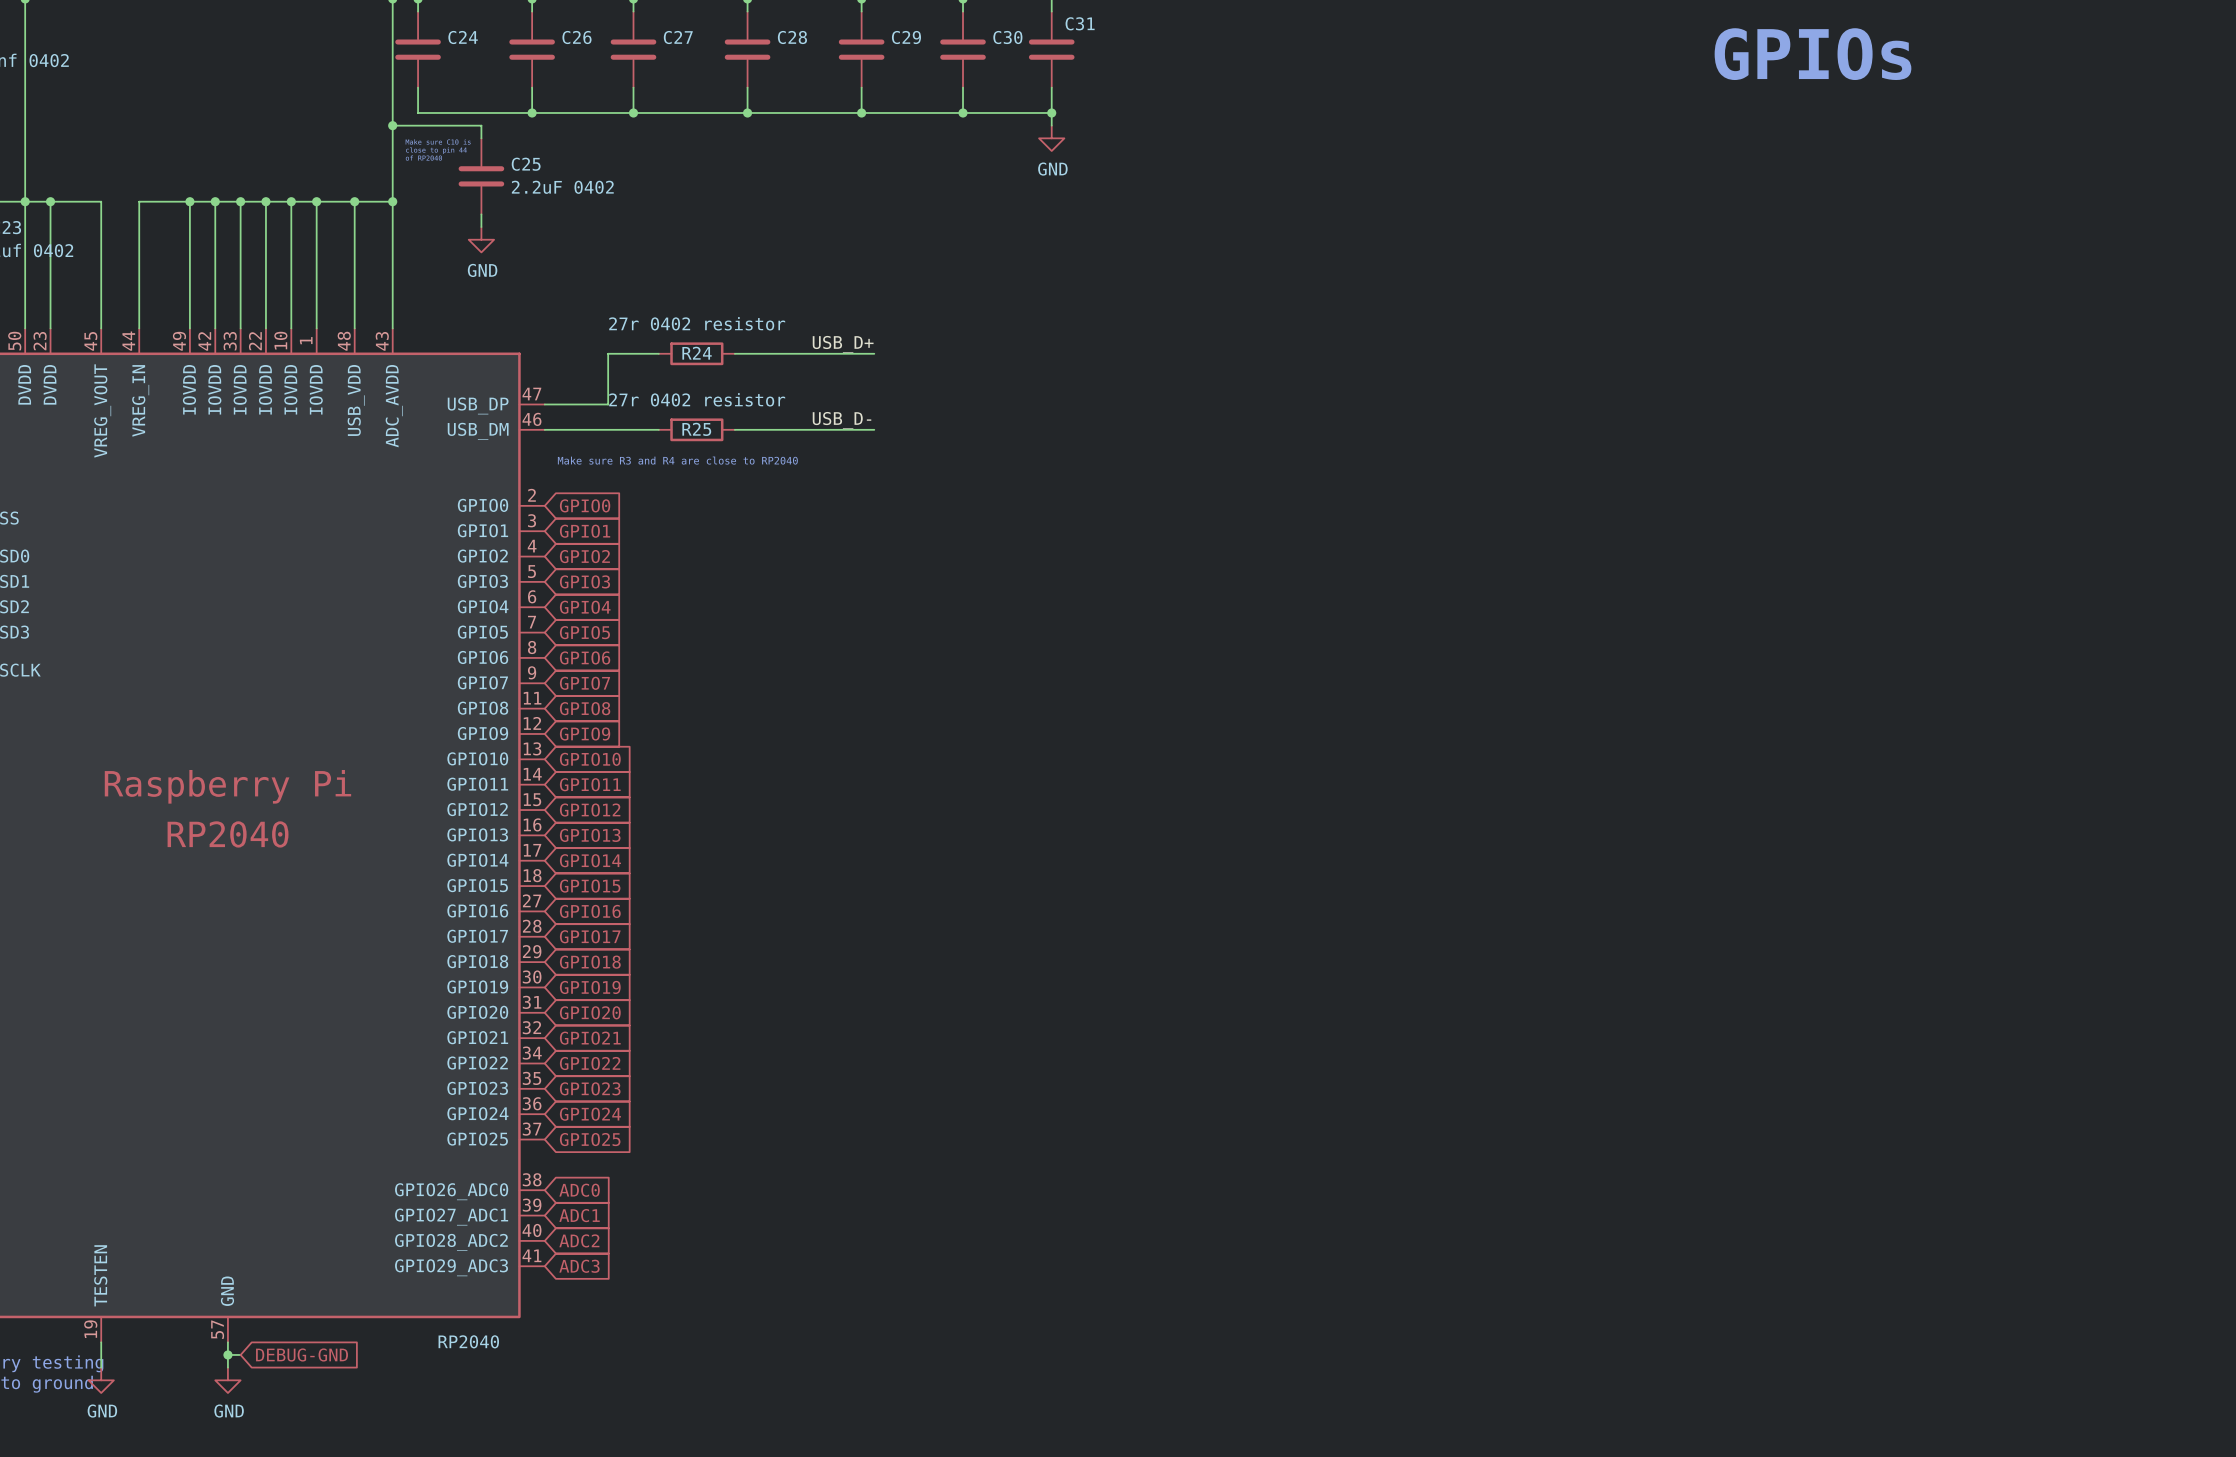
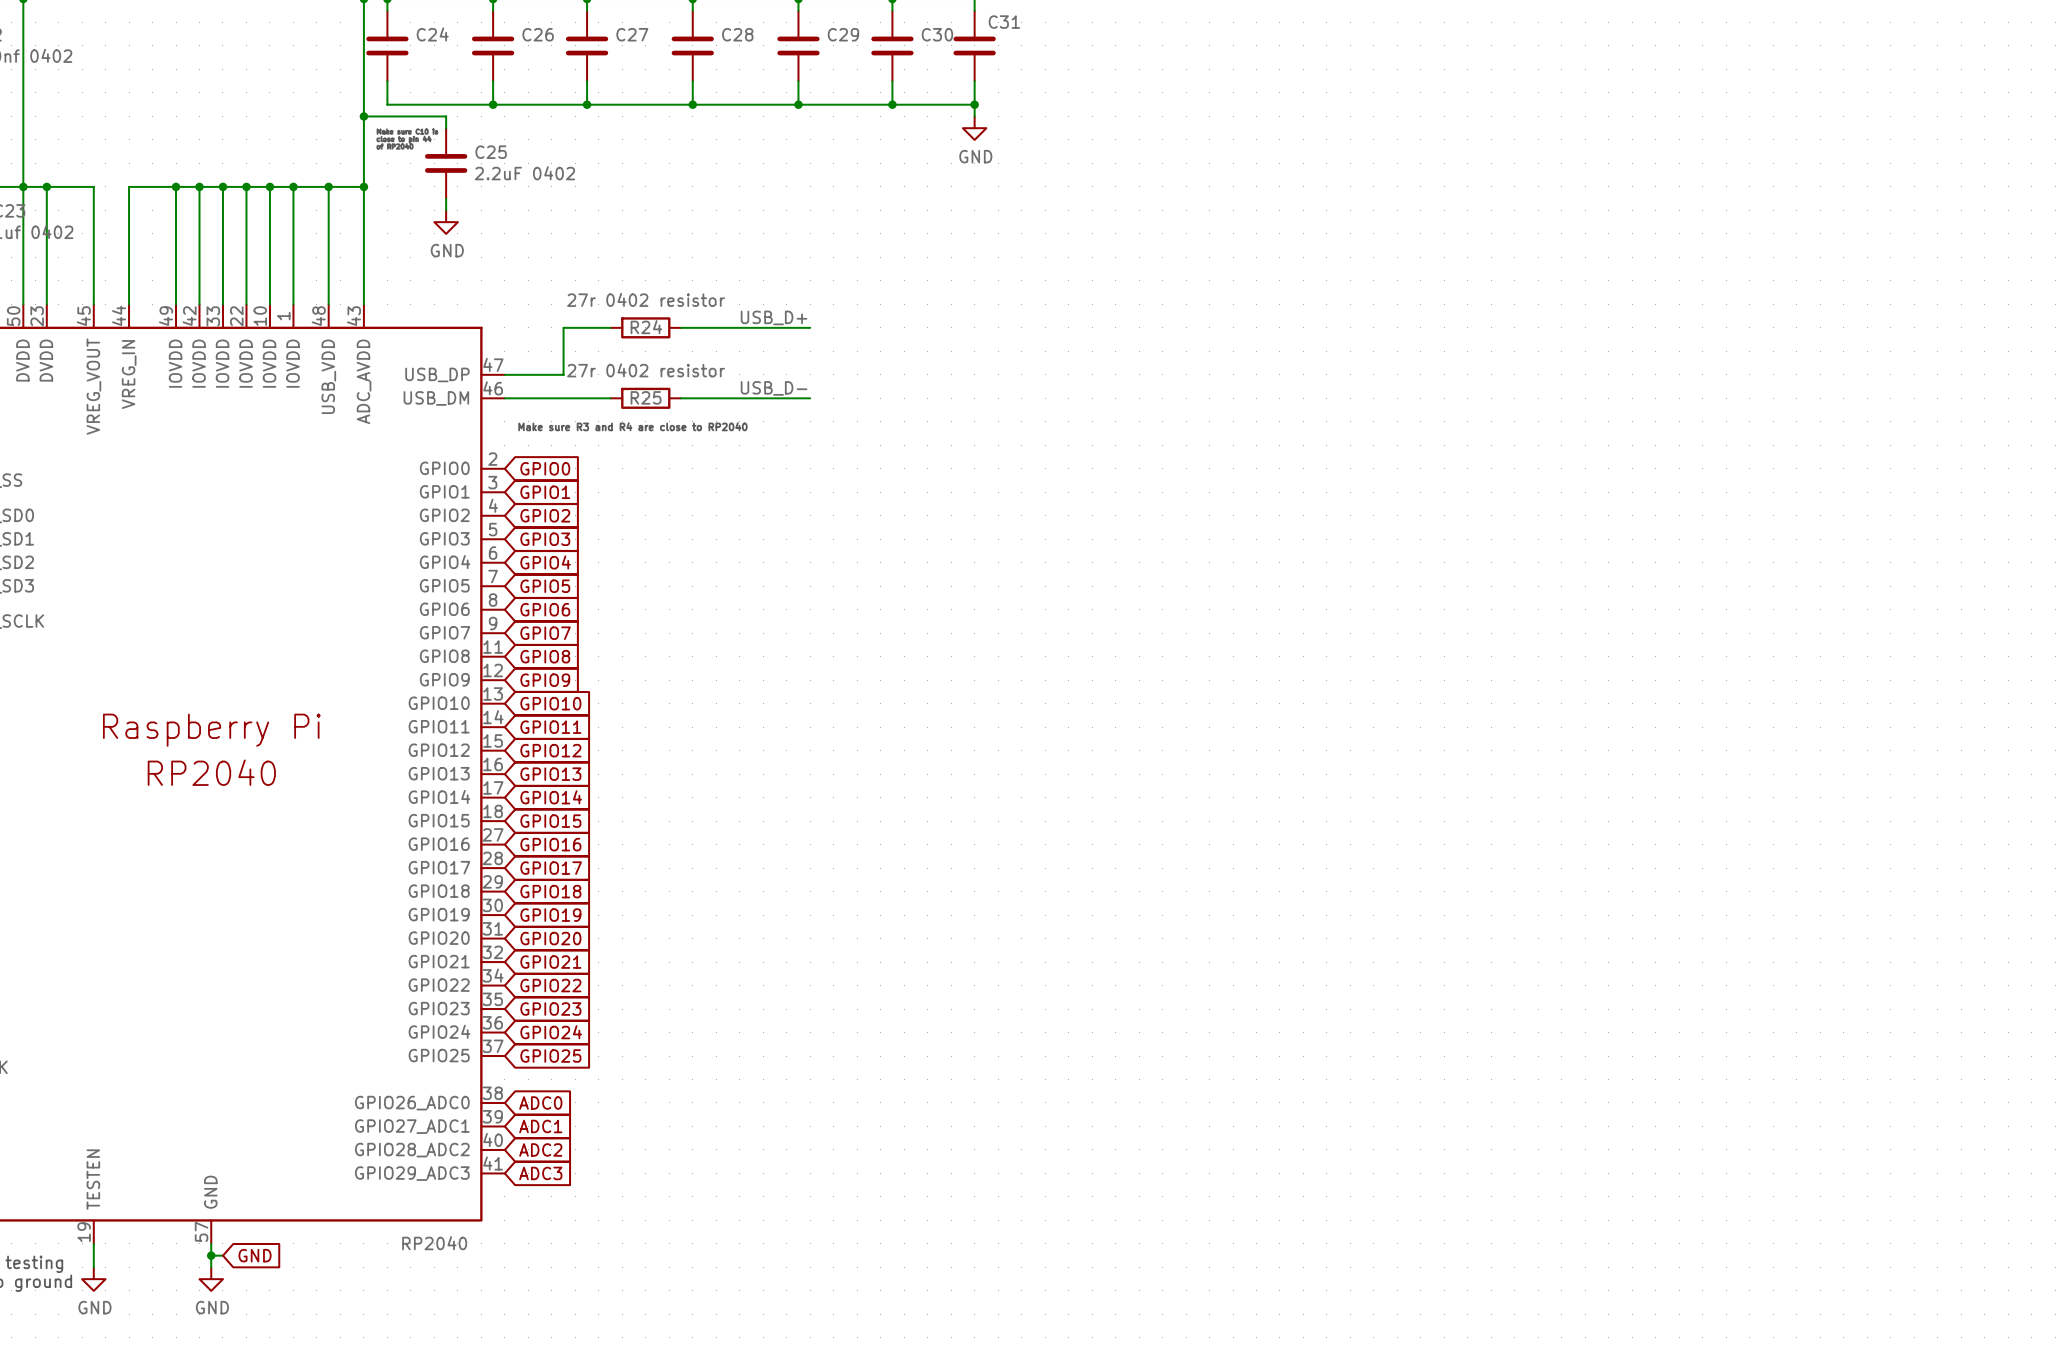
text: GPIOs (1813, 54) -> none
global label: DEBUG-GND (302, 1354) -> GND (255, 1255)

